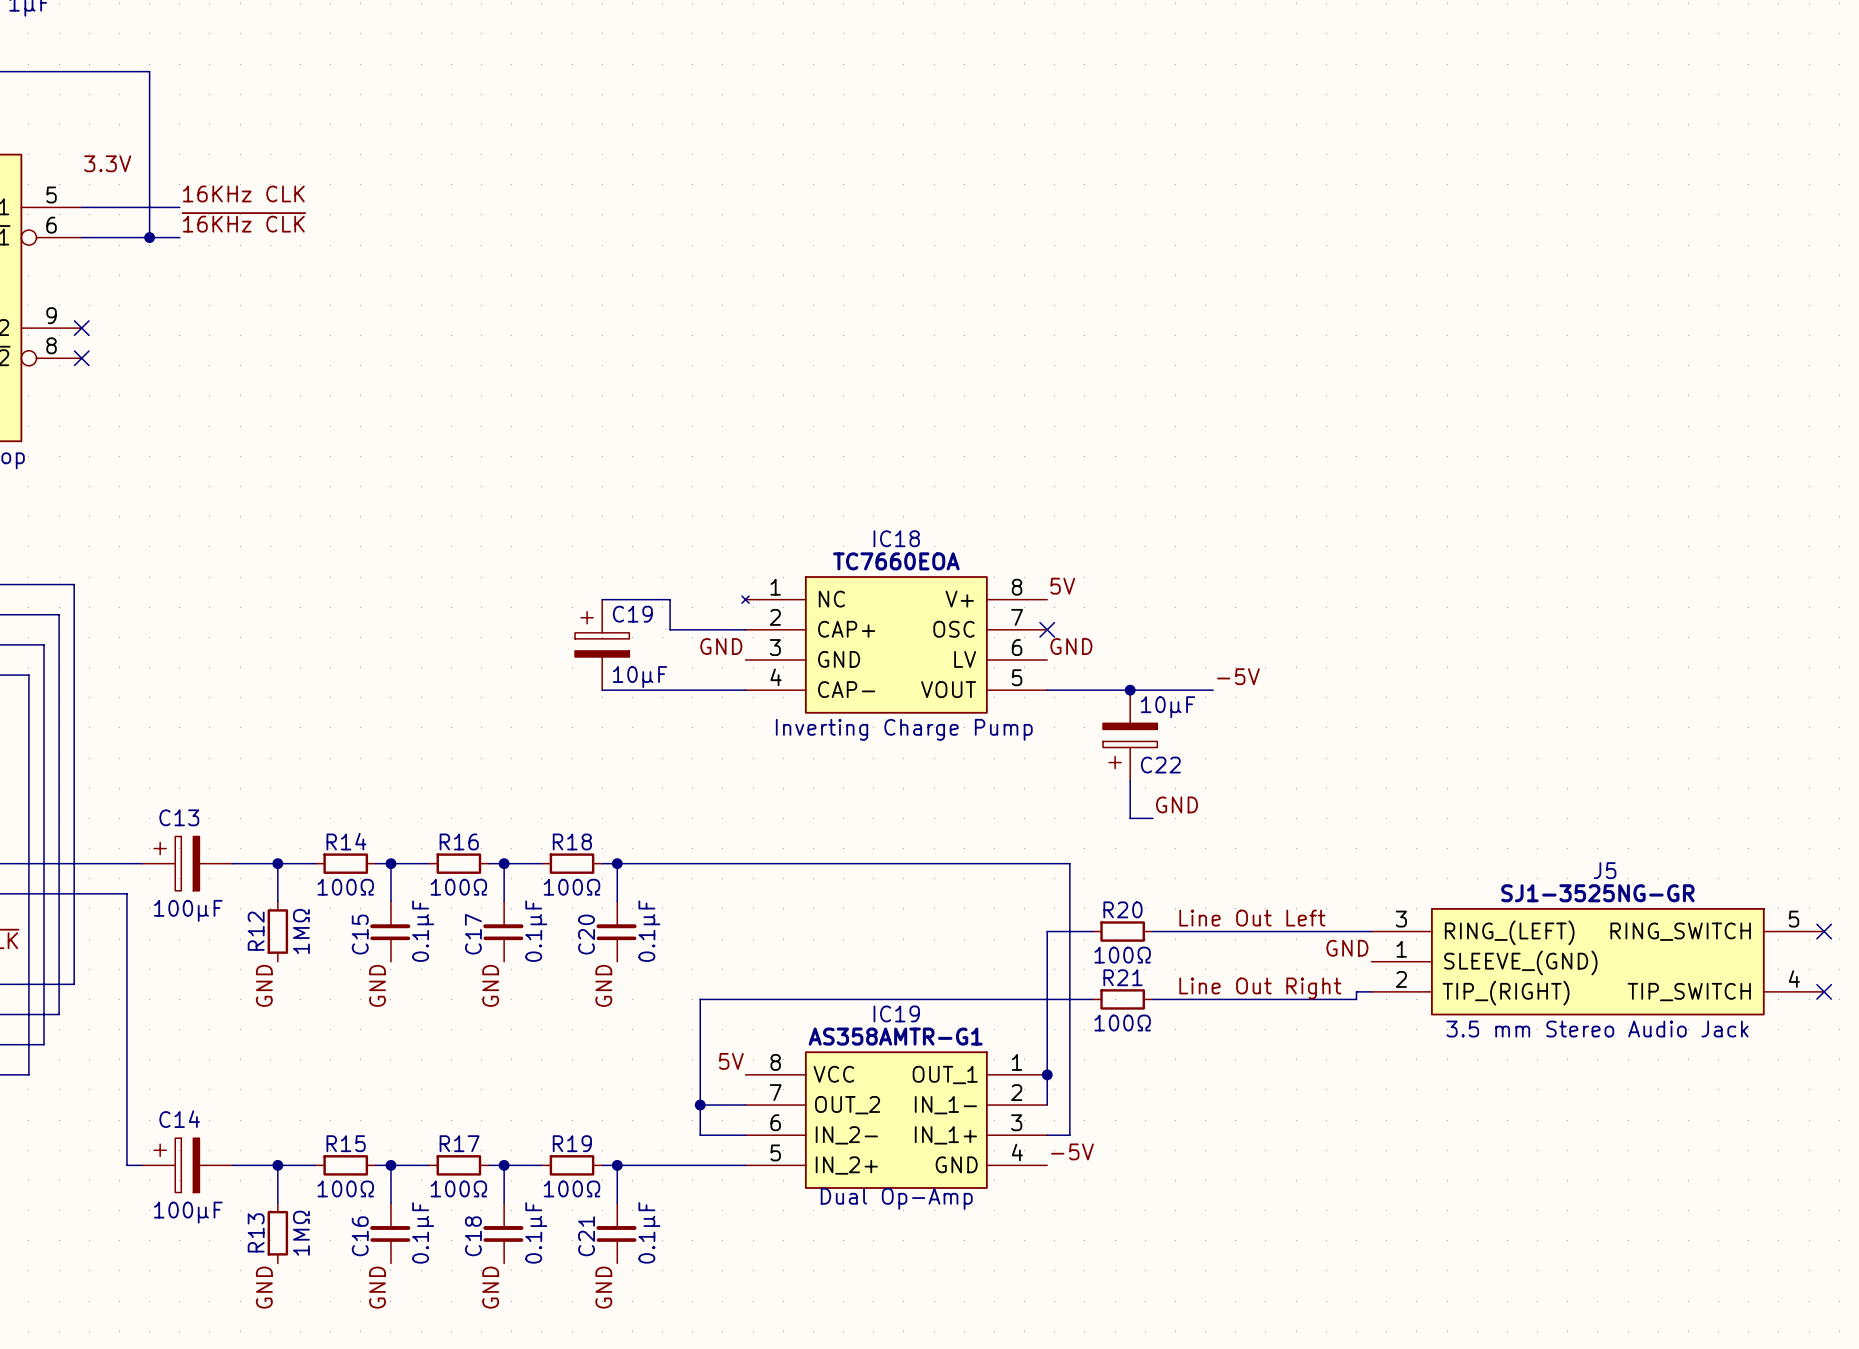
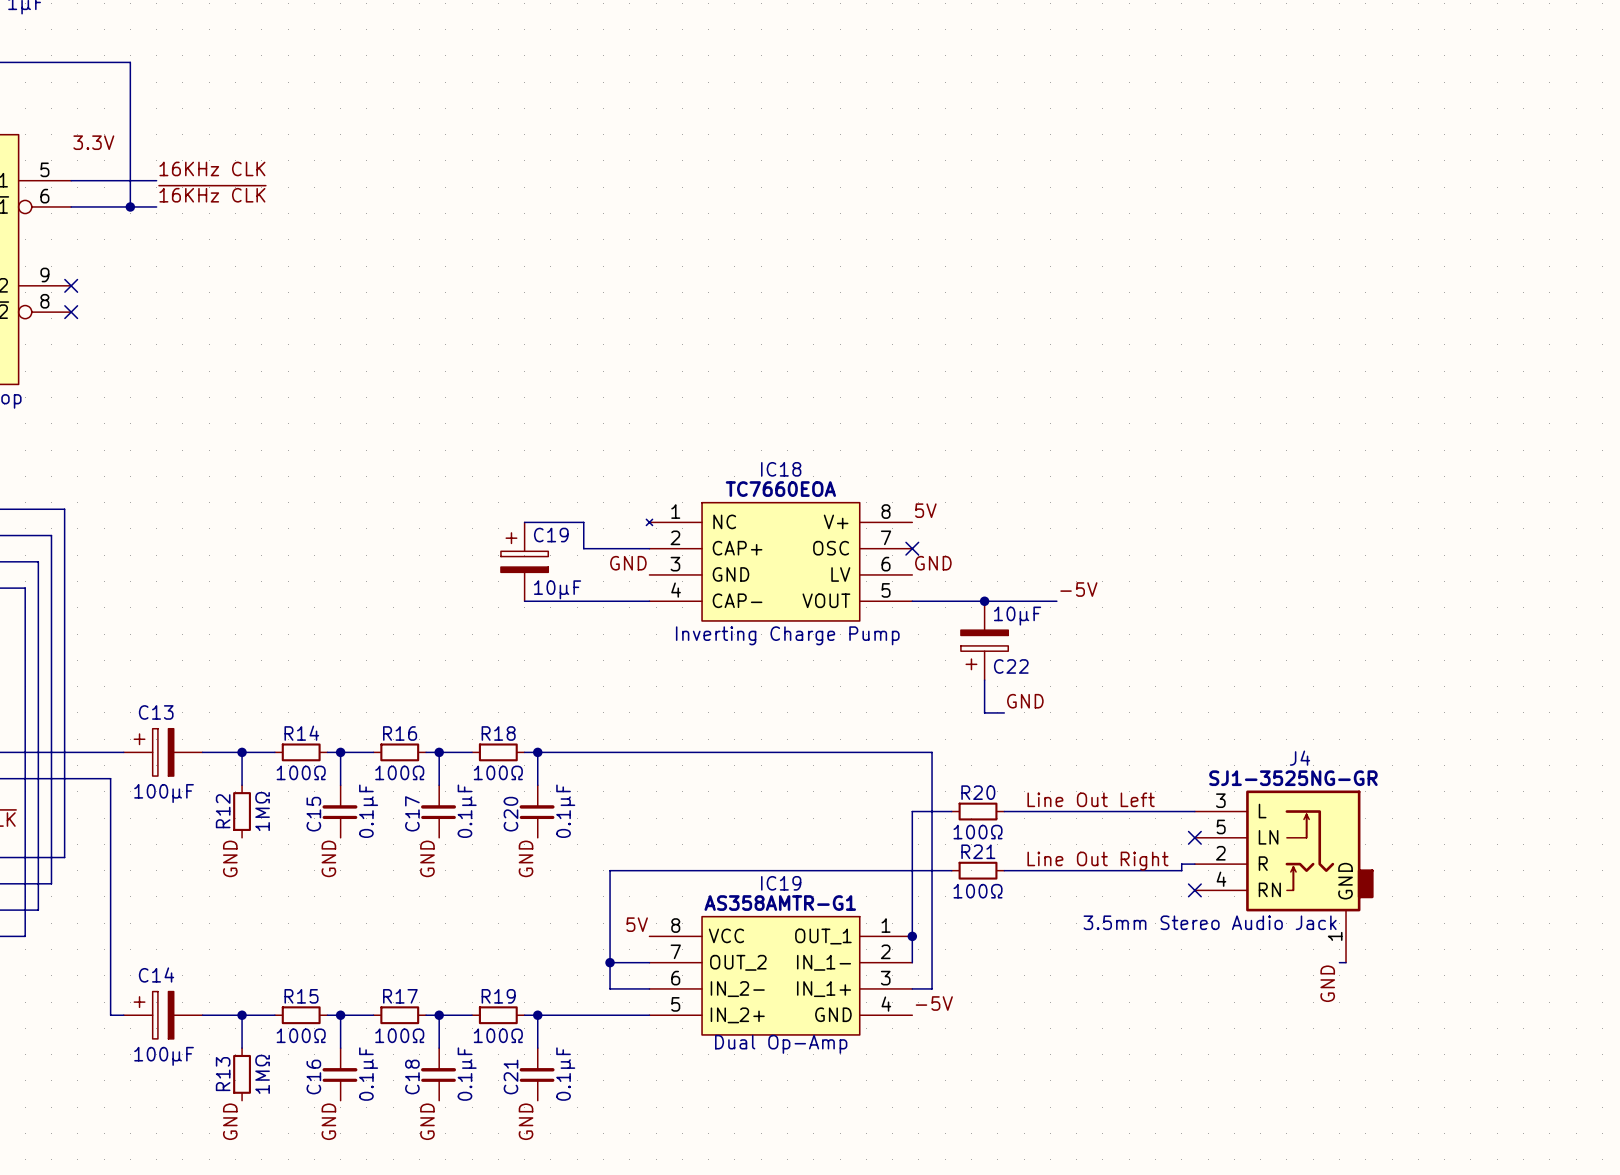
no-connect mark: (1824, 931) -> none
label rotation: 0° (1347, 948) -> 90° counterclockwise (1327, 983)
label position: GND (1347, 948) -> GND (1327, 983)
no-connect mark: none -> (1194, 837)
J5: SJ1-3525NG-GR (1597, 961) -> none
no-connect mark: (1824, 991) -> none
J4: none -> SJ1-3525NG-GR (1284, 876)
no-connect mark: none -> (1194, 890)
wire: none -> (1339, 962) (1346, 962)

